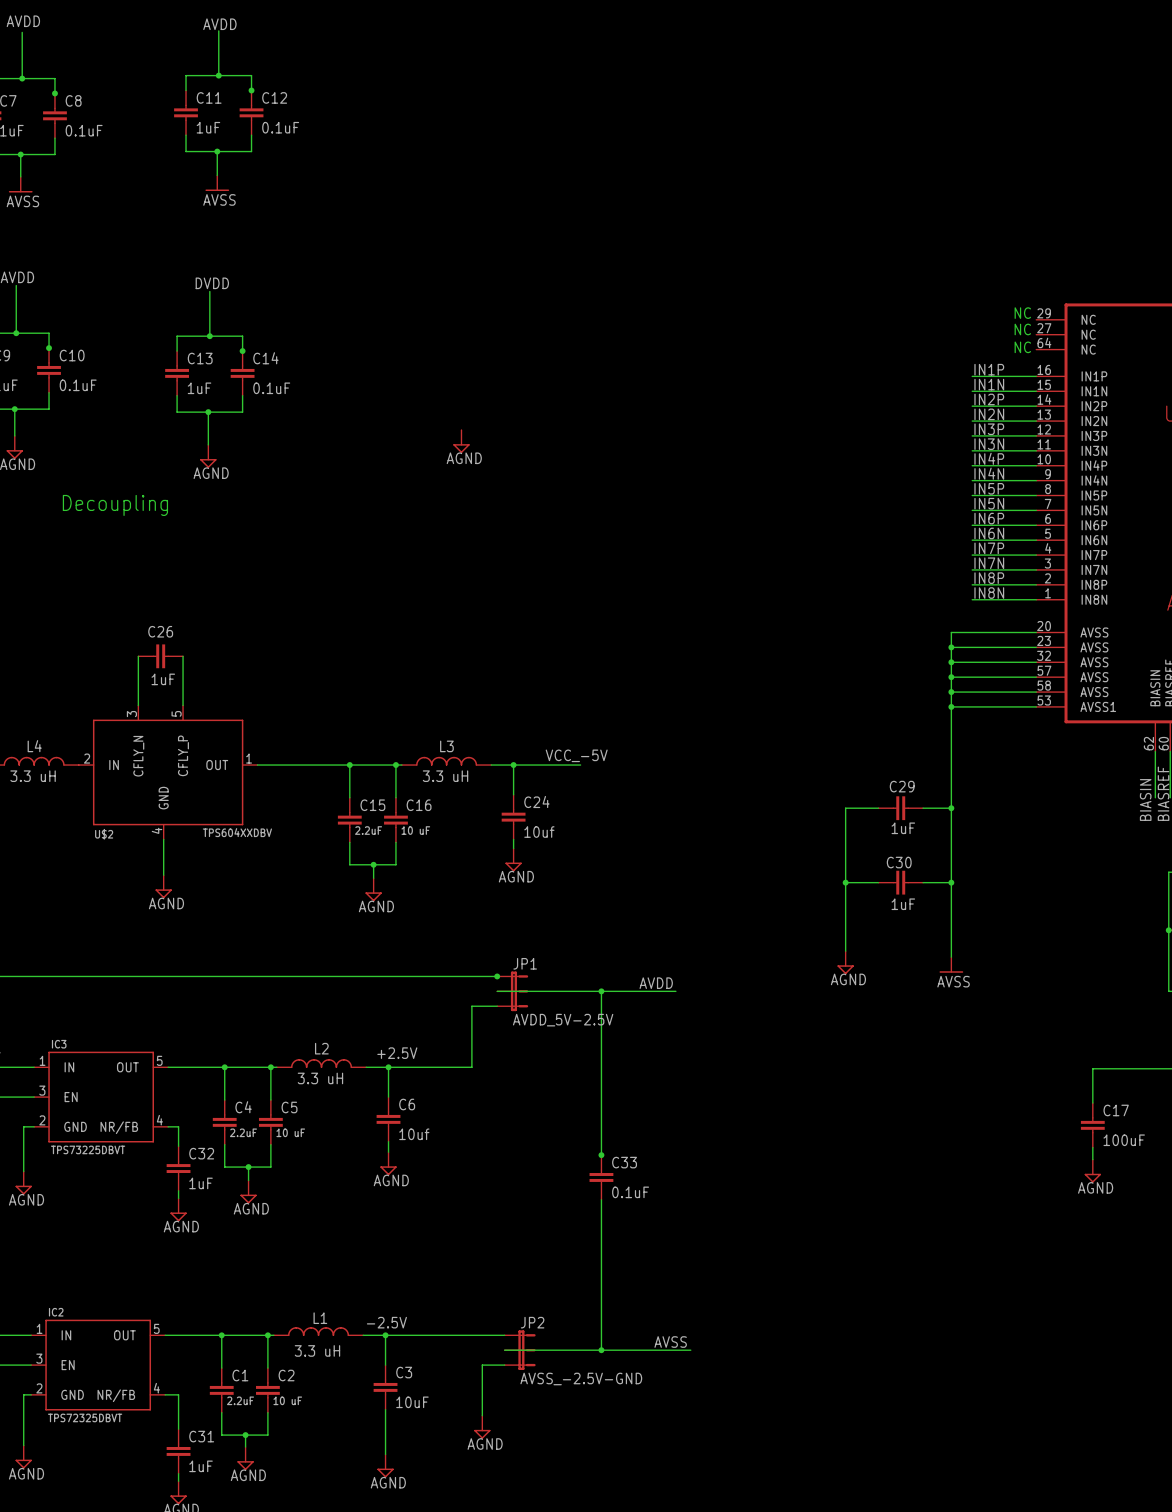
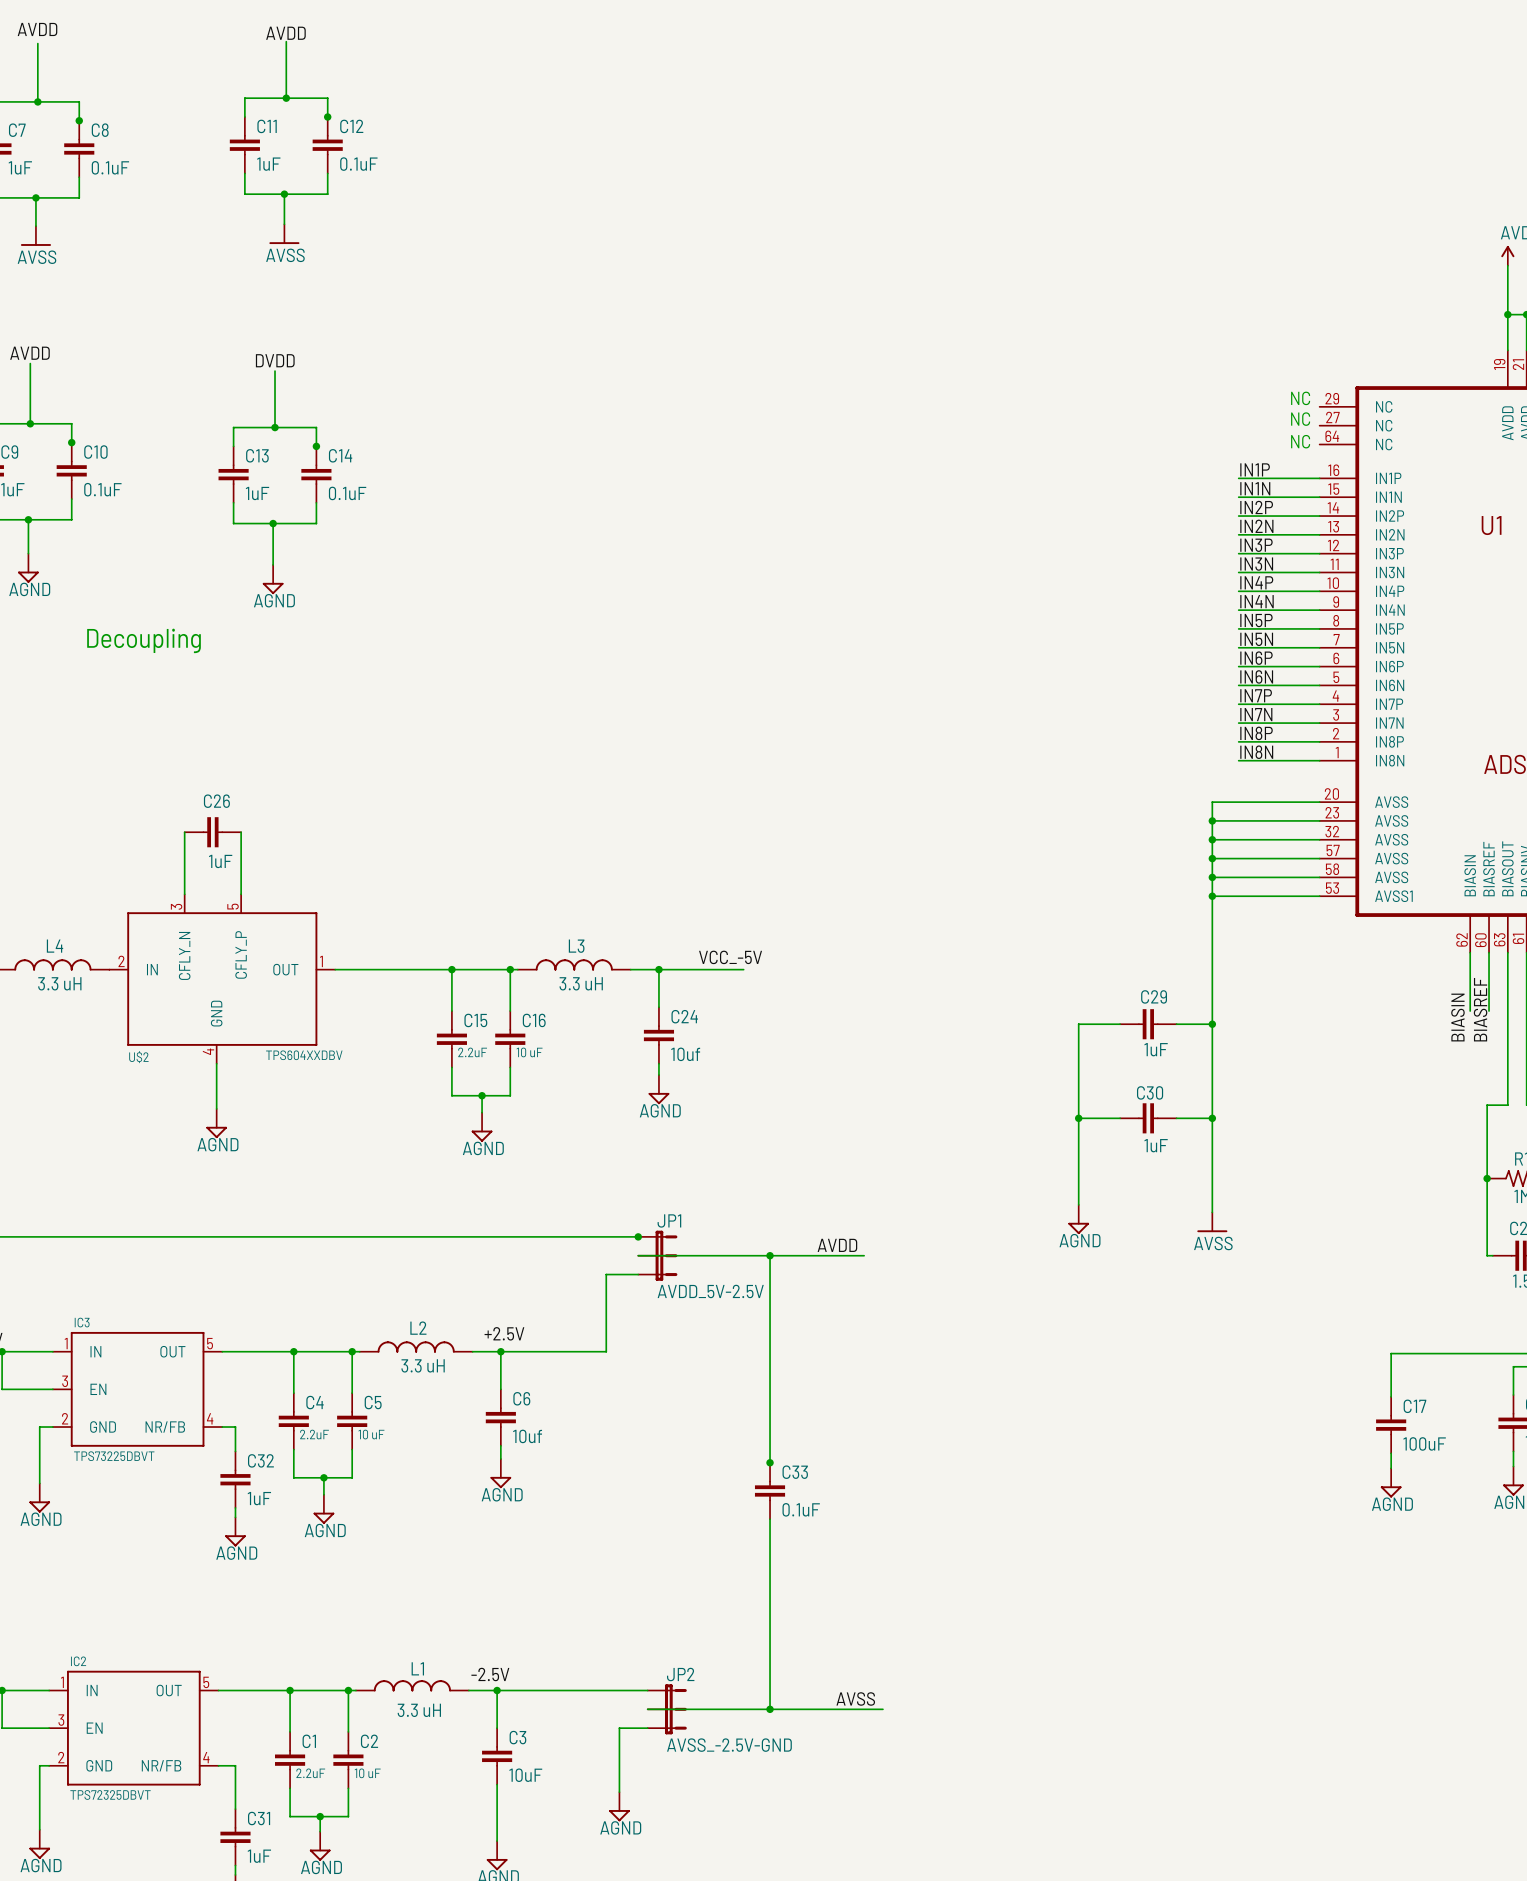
power symbol: AGND (461, 441) -> none

